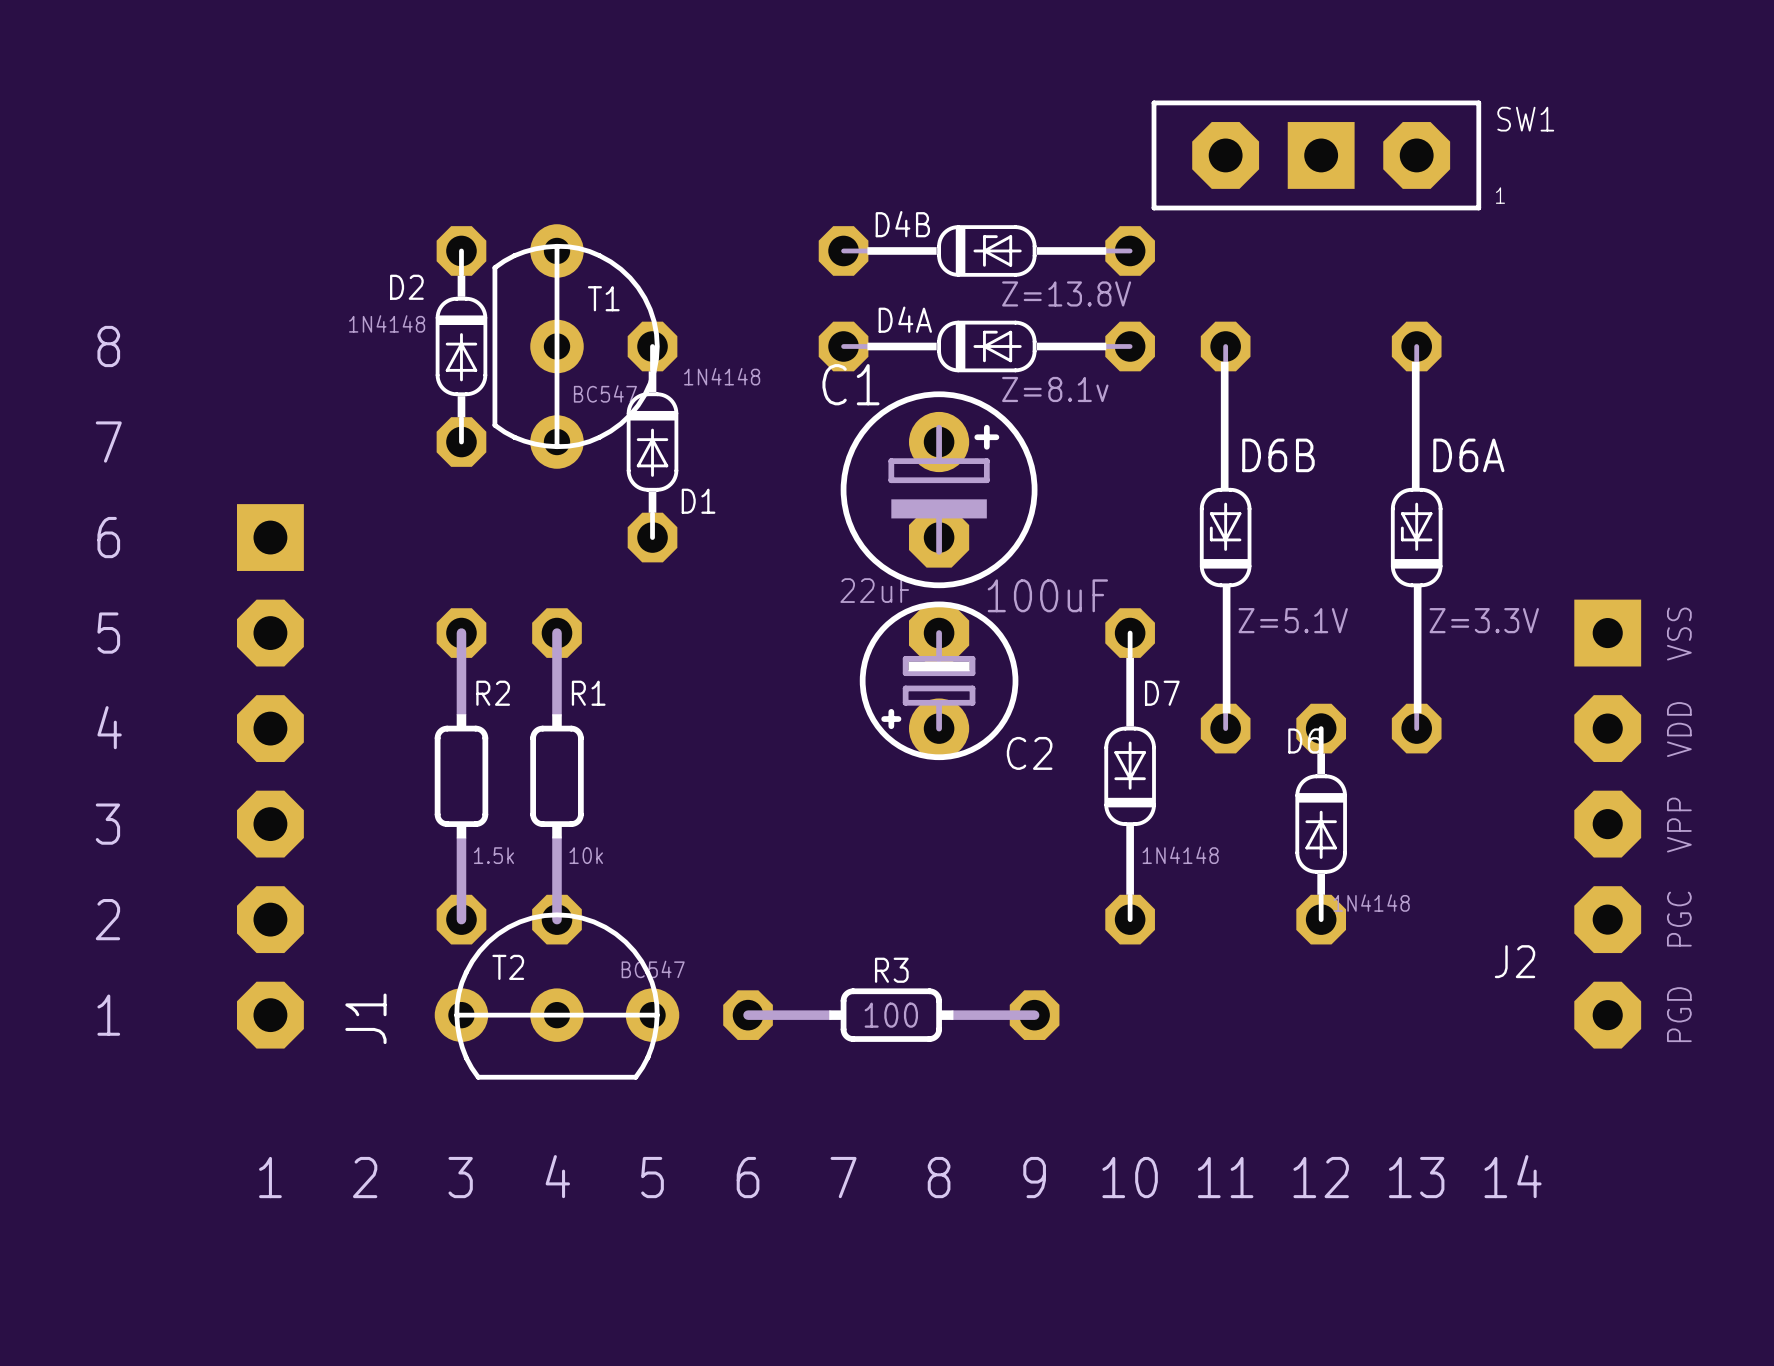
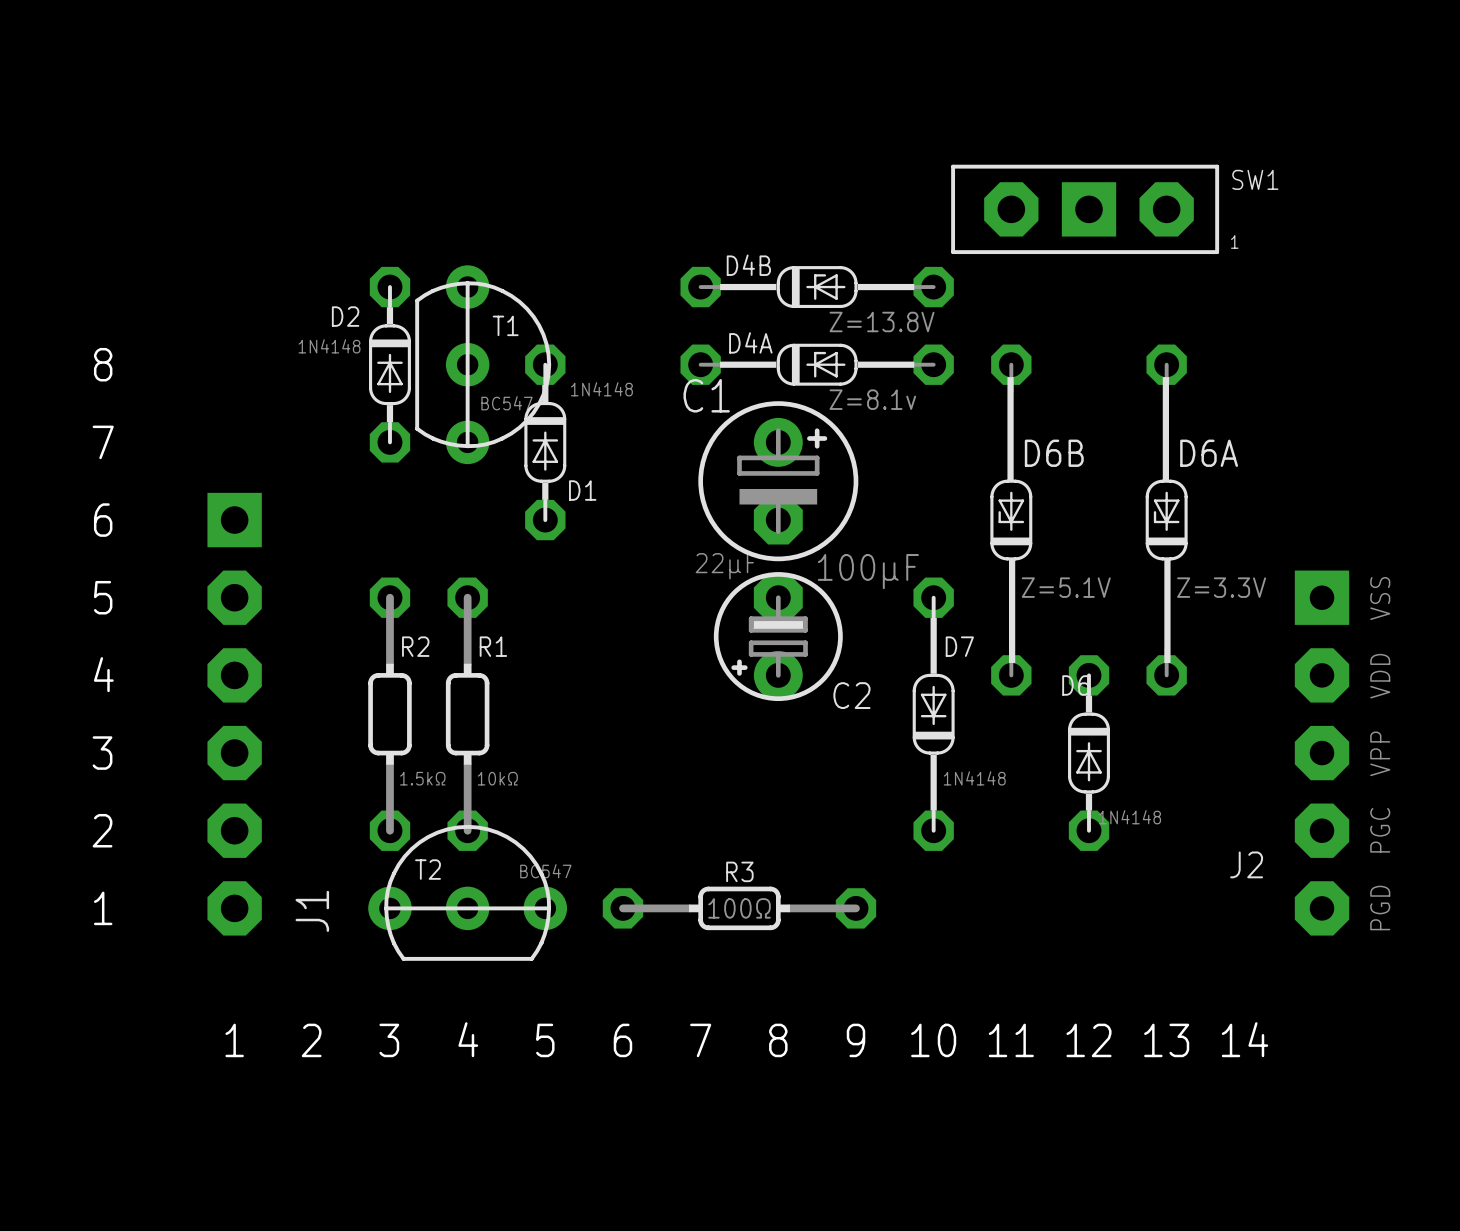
C2 value: 22uF (876, 590) -> 22μF (725, 566)
C1 value: 100uF (1047, 595) -> 100μF (868, 571)
R2 value: 1.5k (493, 855) -> 1.5kΩ (422, 778)
R1 value: 10k (586, 855) -> 10kΩ (497, 778)
R3 value: 100 (891, 1015) -> 100Ω (739, 908)

